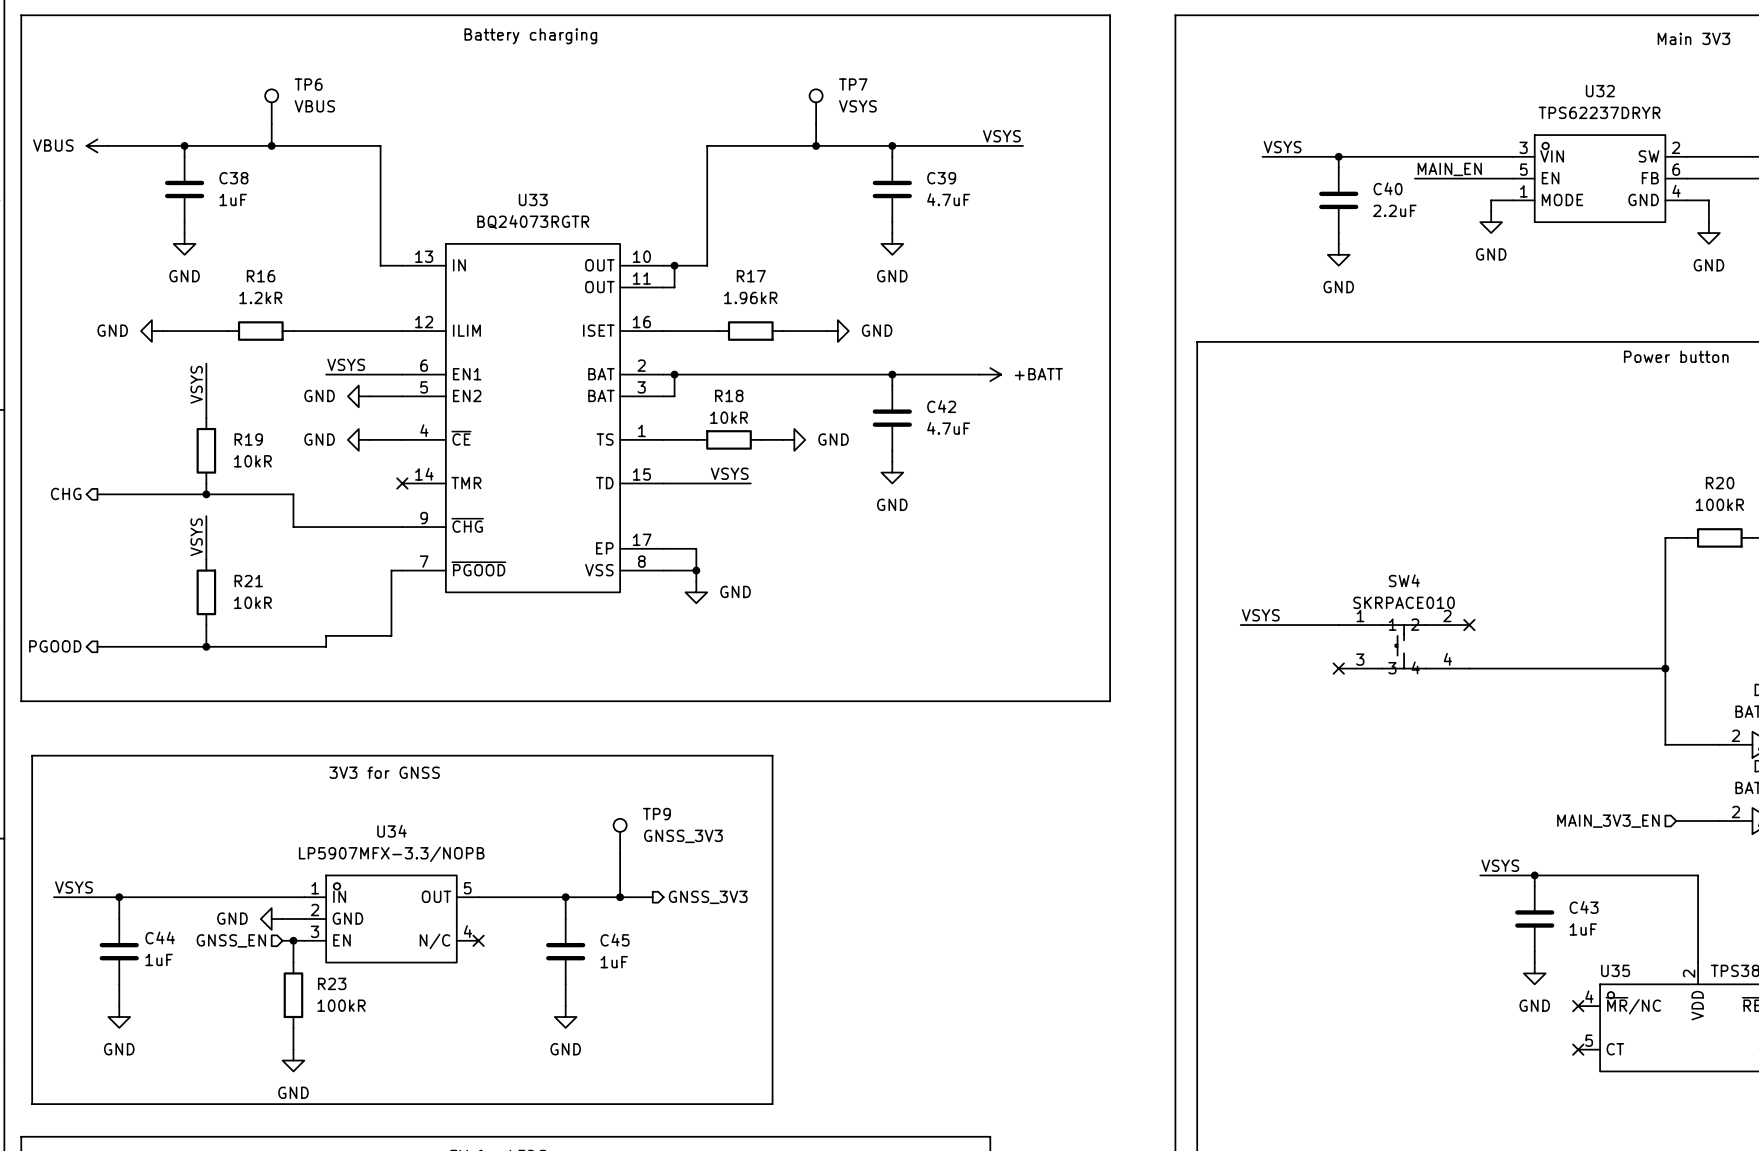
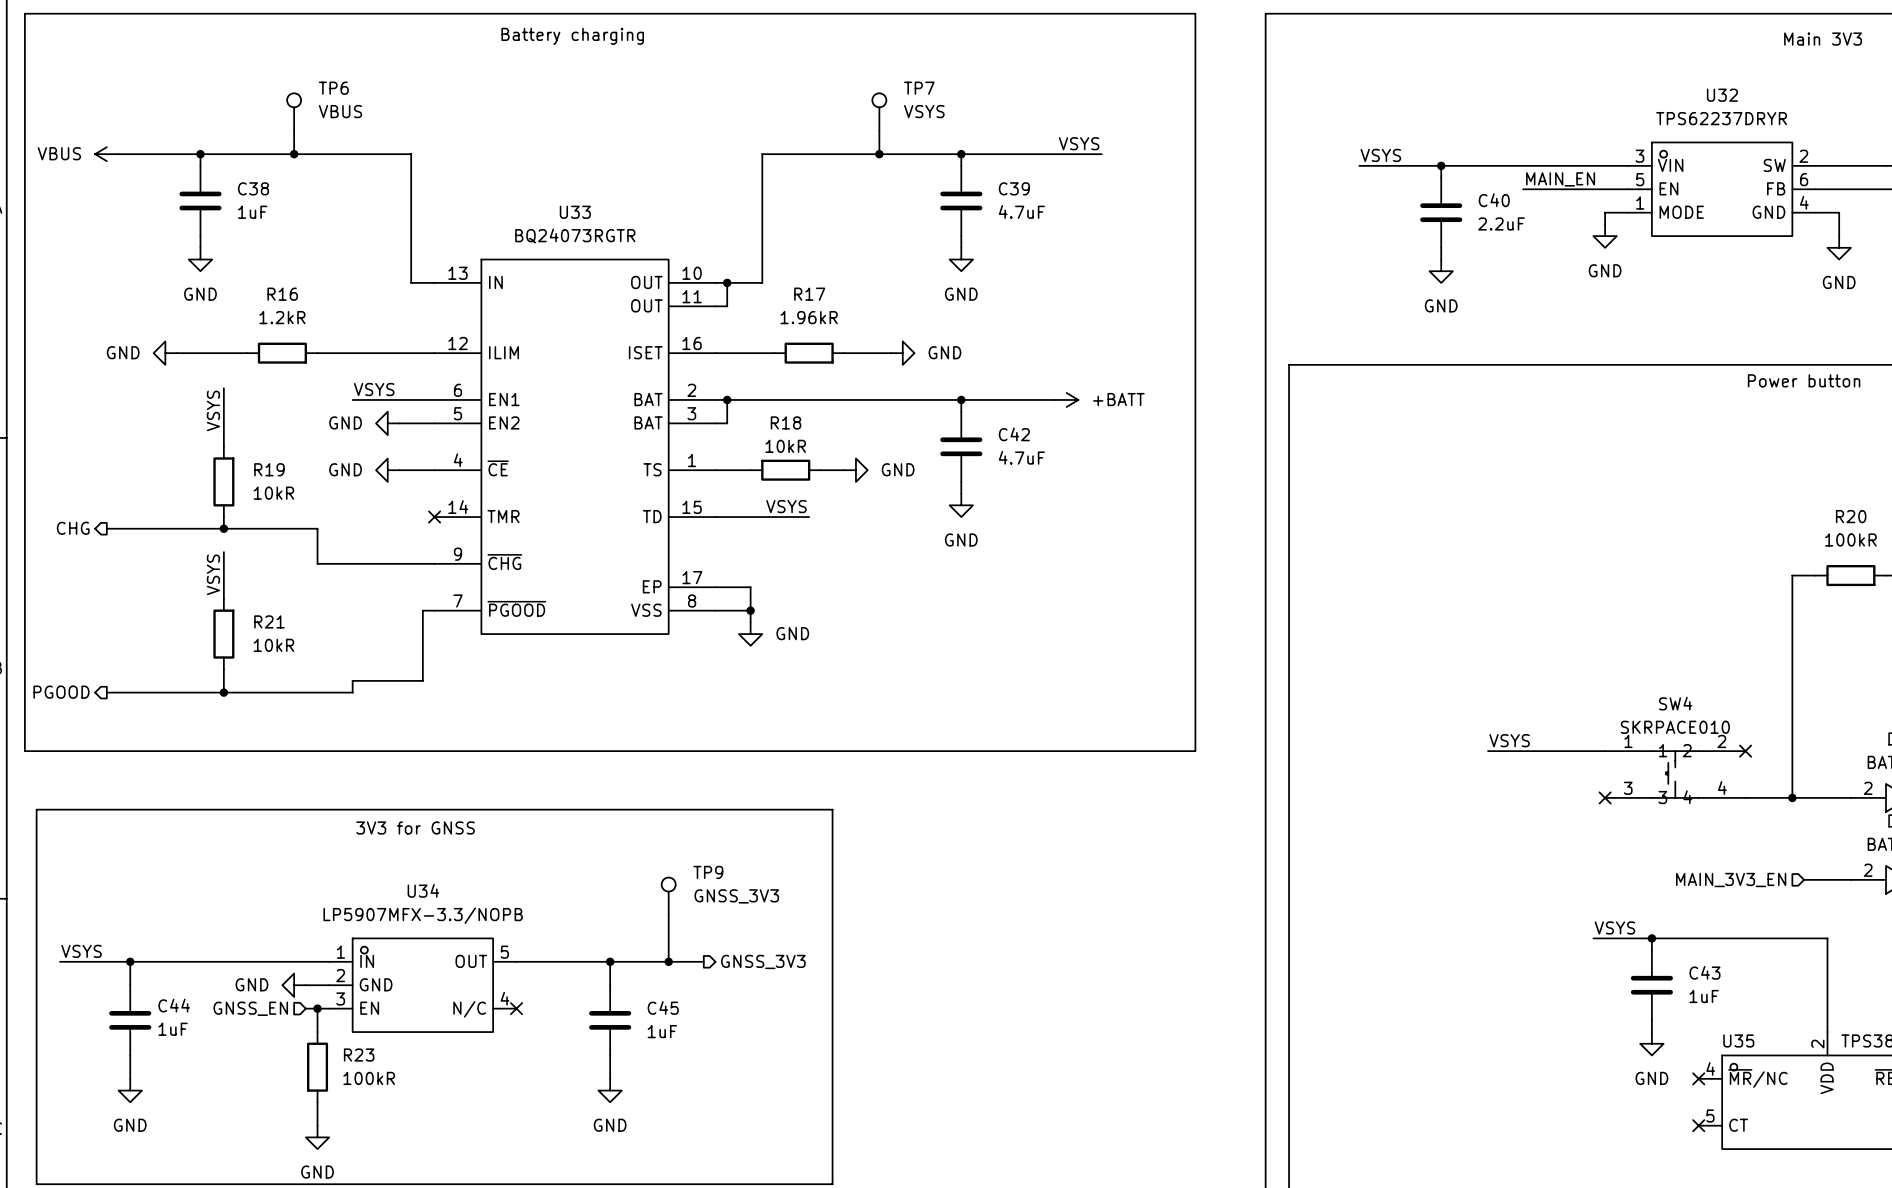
label position: VSYS (1260, 615) -> VSYS (1509, 740)
wire: (1240, 625) (1338, 625) -> none
no-connect mark: (1469, 625) -> none
SW4 position: (1404, 646) -> (1675, 774)
no-connect mark: (1338, 668) -> none
wire: (1469, 668) (1665, 668) -> none
junction: (1665, 668) -> none
wire: none -> (1488, 751) (1605, 751)
no-connect mark: none -> (1745, 751)
no-connect mark: none -> (1605, 797)
wire: none -> (1745, 797) (1792, 797)
junction: none -> (1792, 797)

